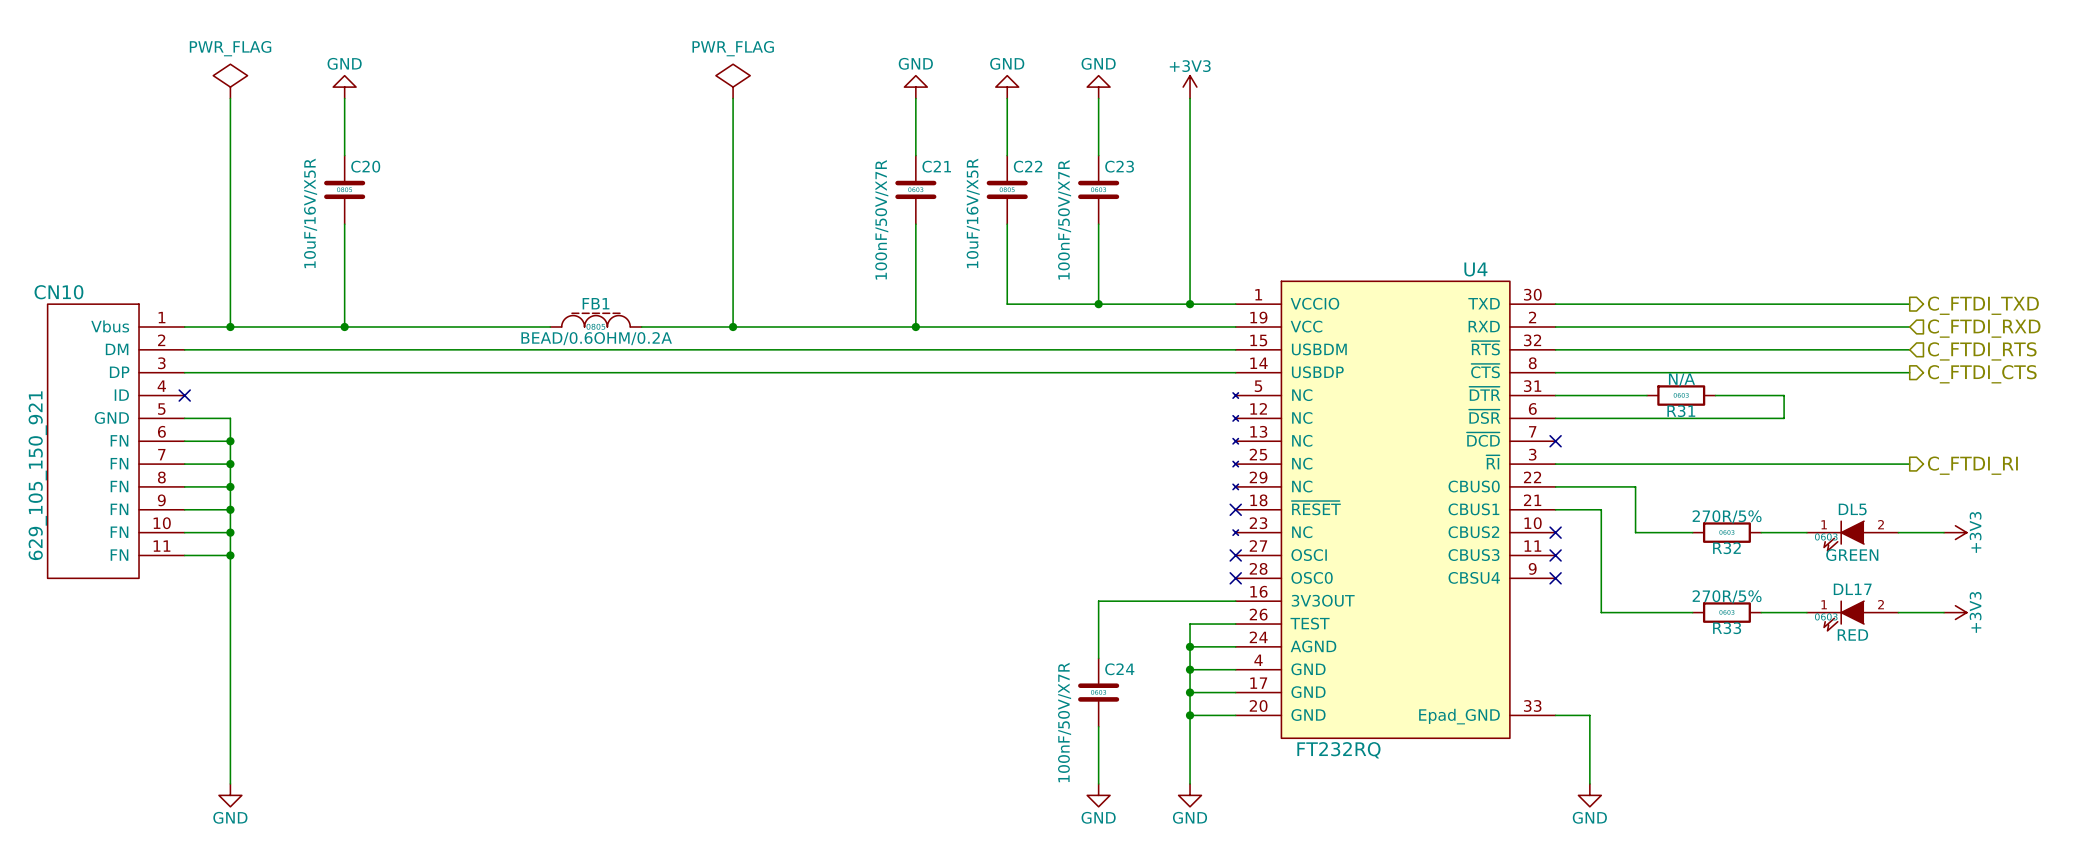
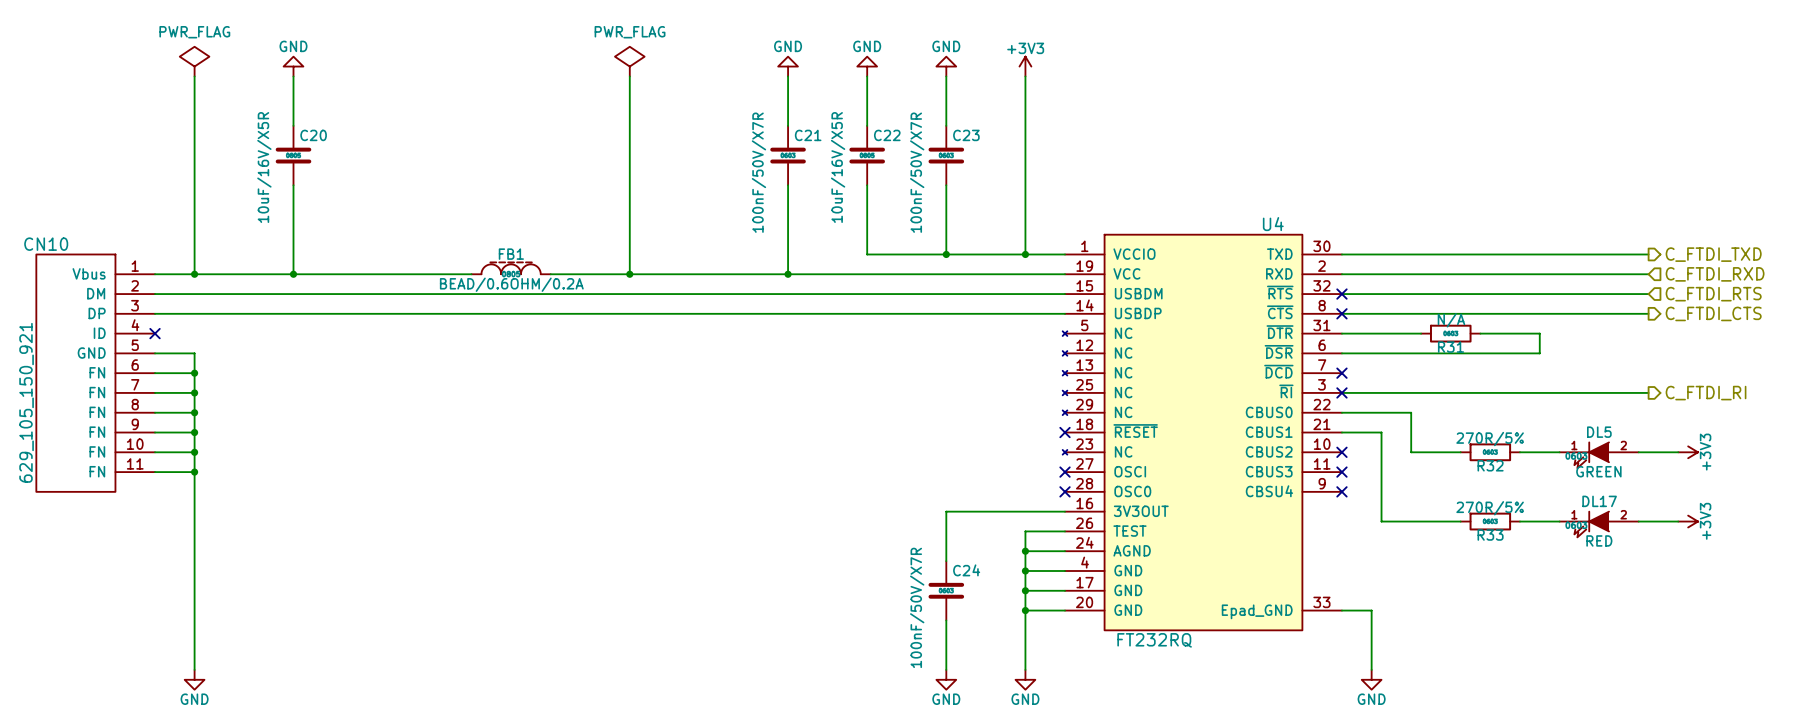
no-connect mark: none -> (1341, 294)
no-connect mark: none -> (1341, 313)
no-connect mark: none -> (1341, 392)

